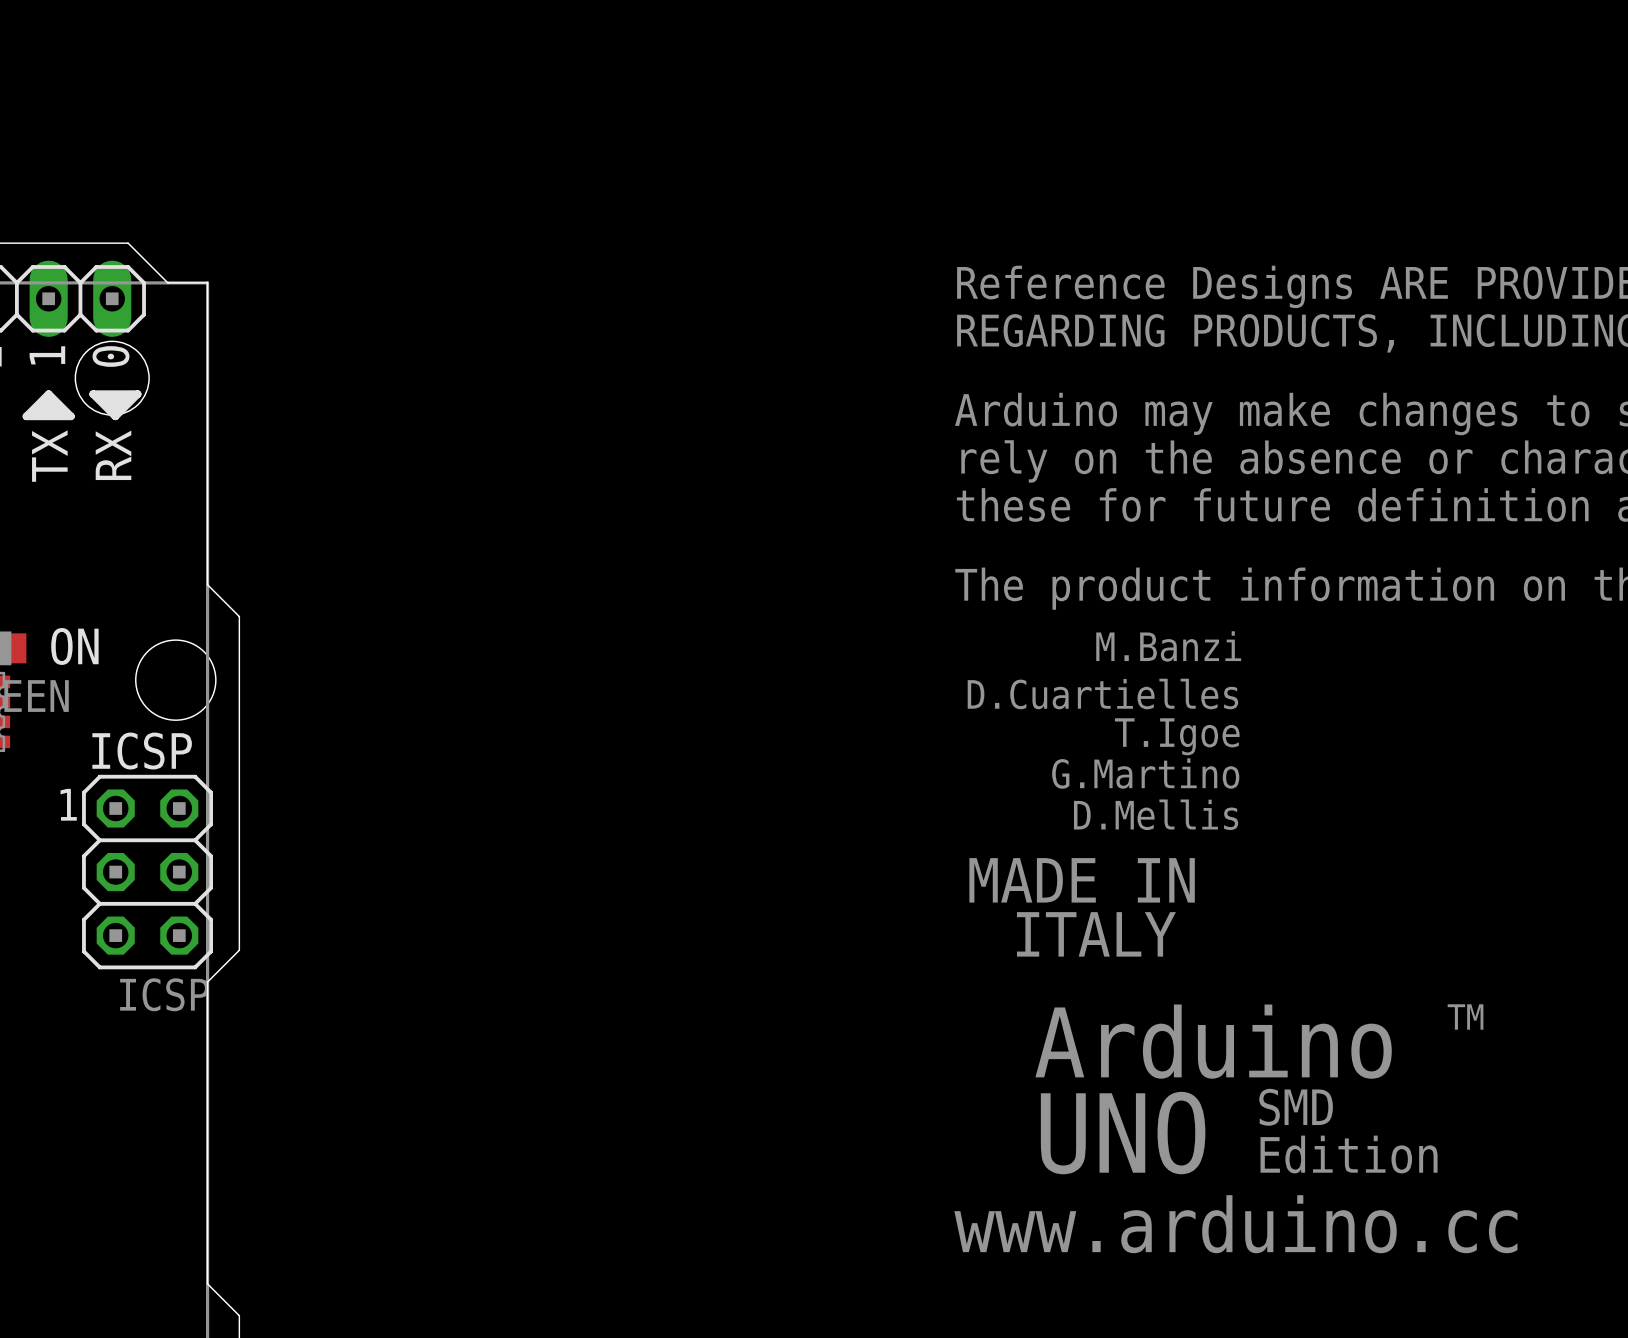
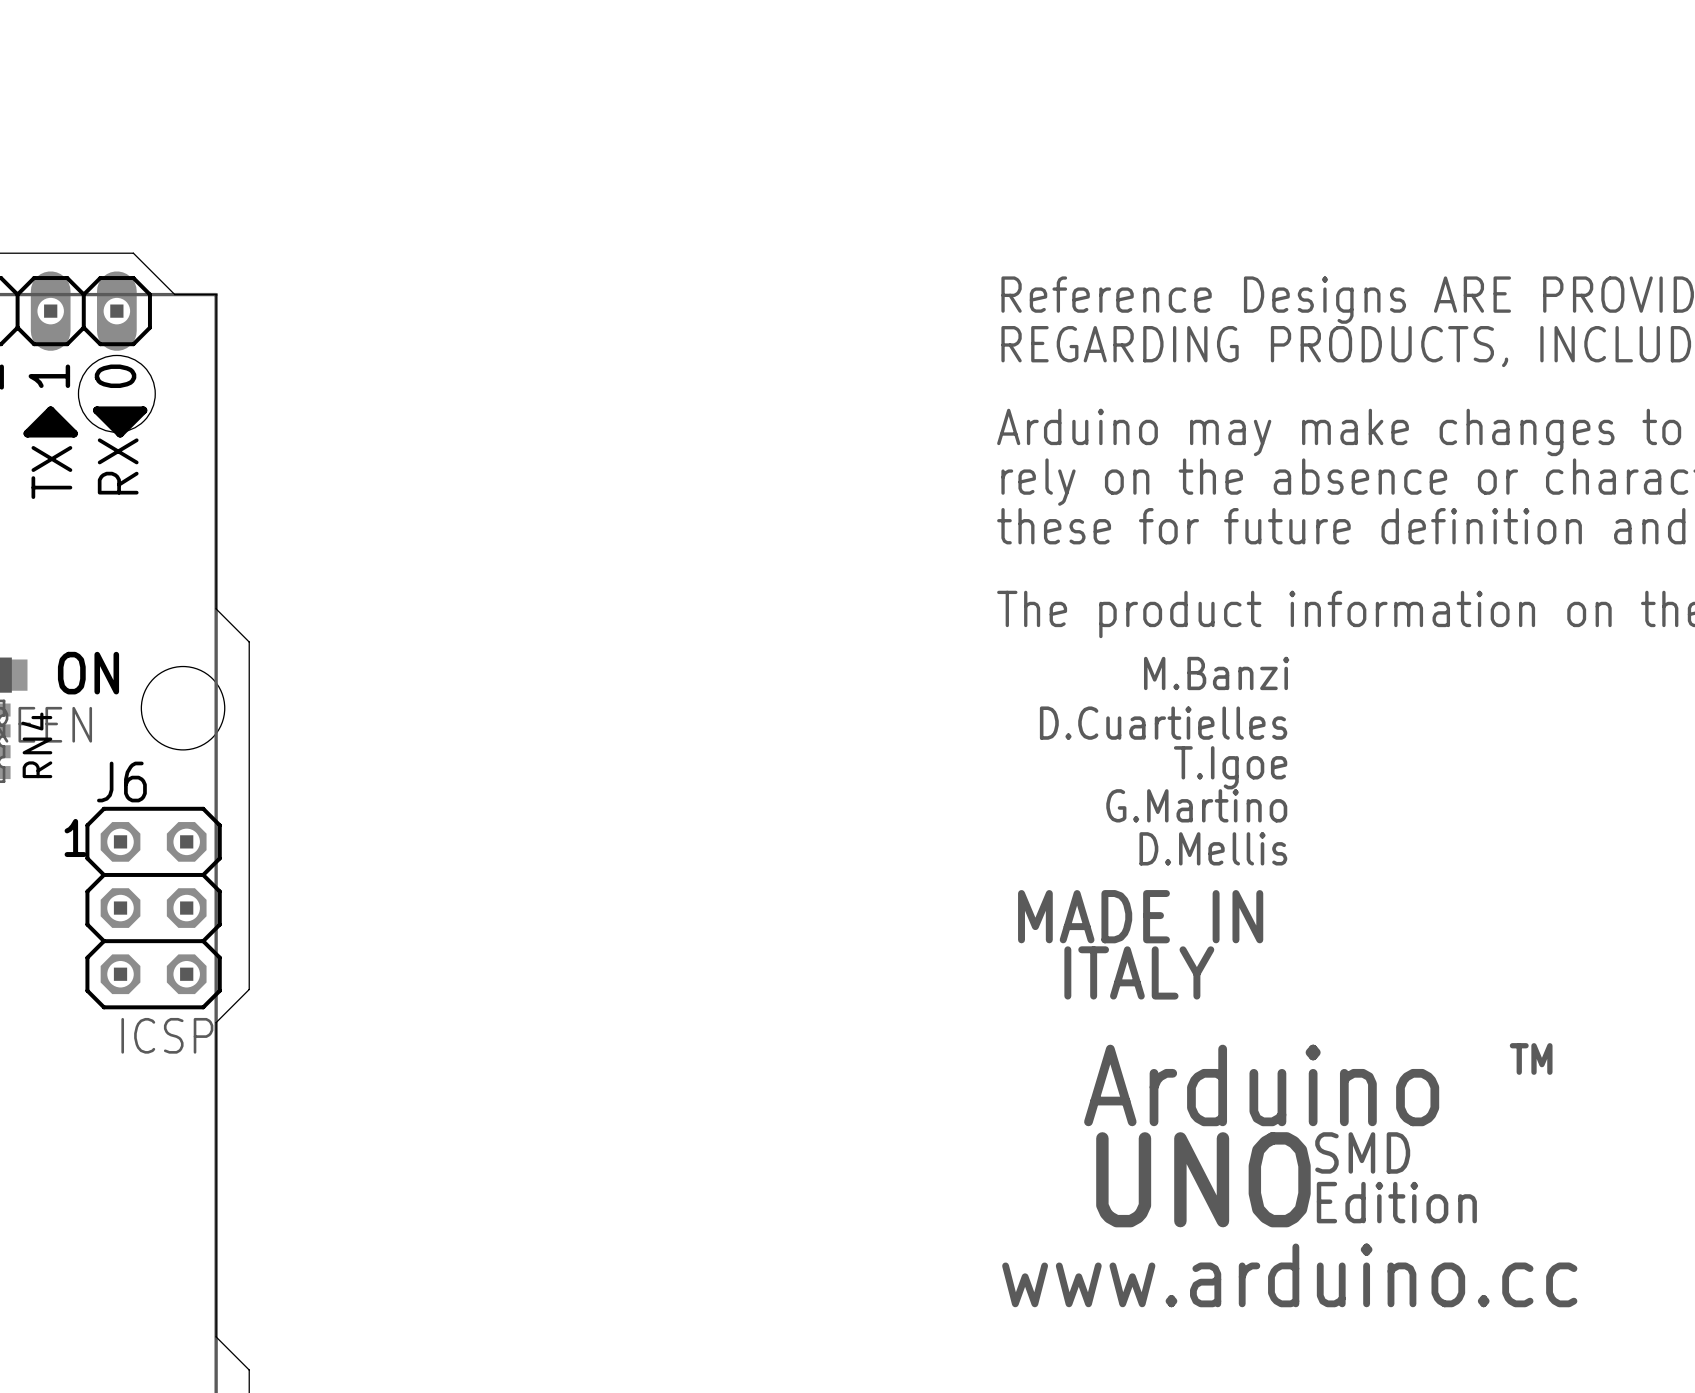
RN4 name: none -> RN4 (36, 745)
ICSP name: ICSP (142, 751) -> J6 (121, 782)

